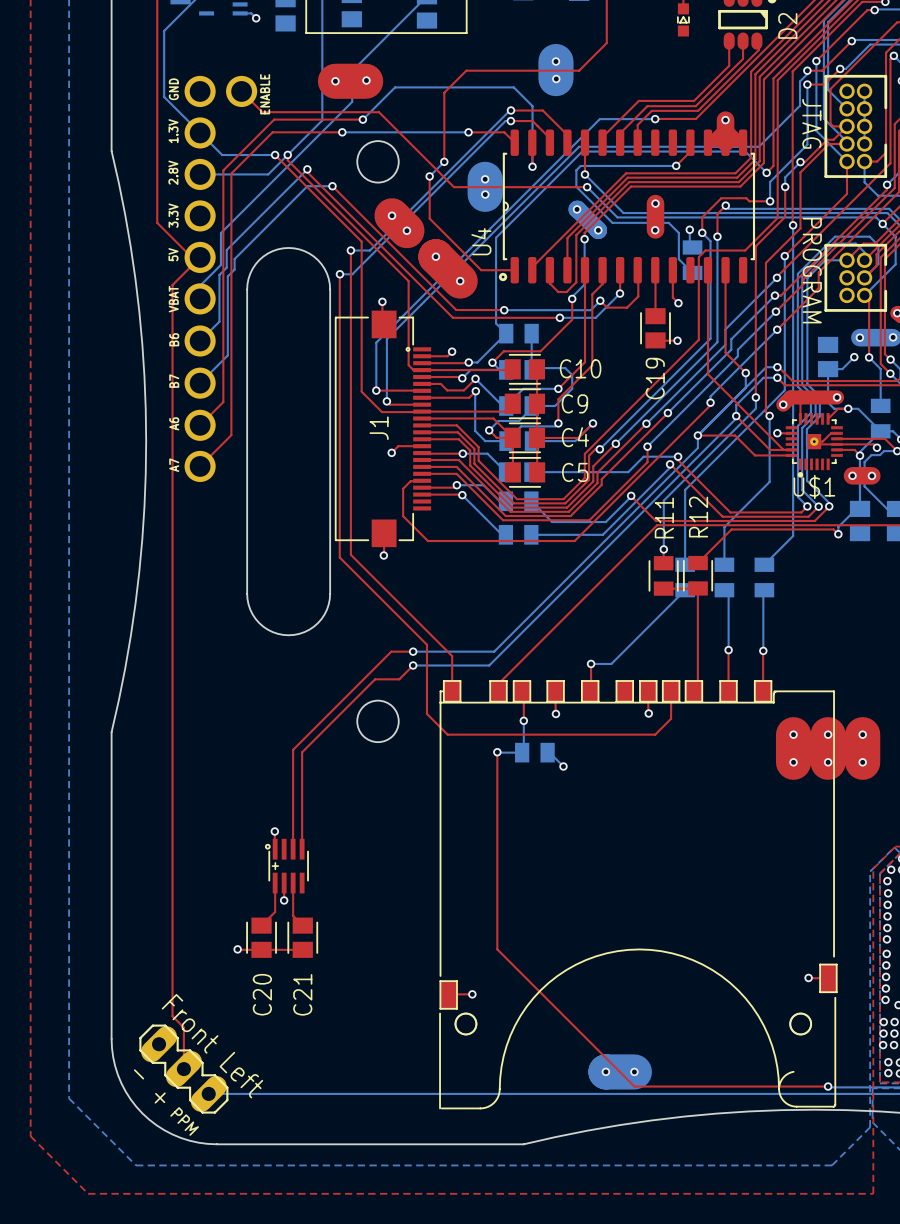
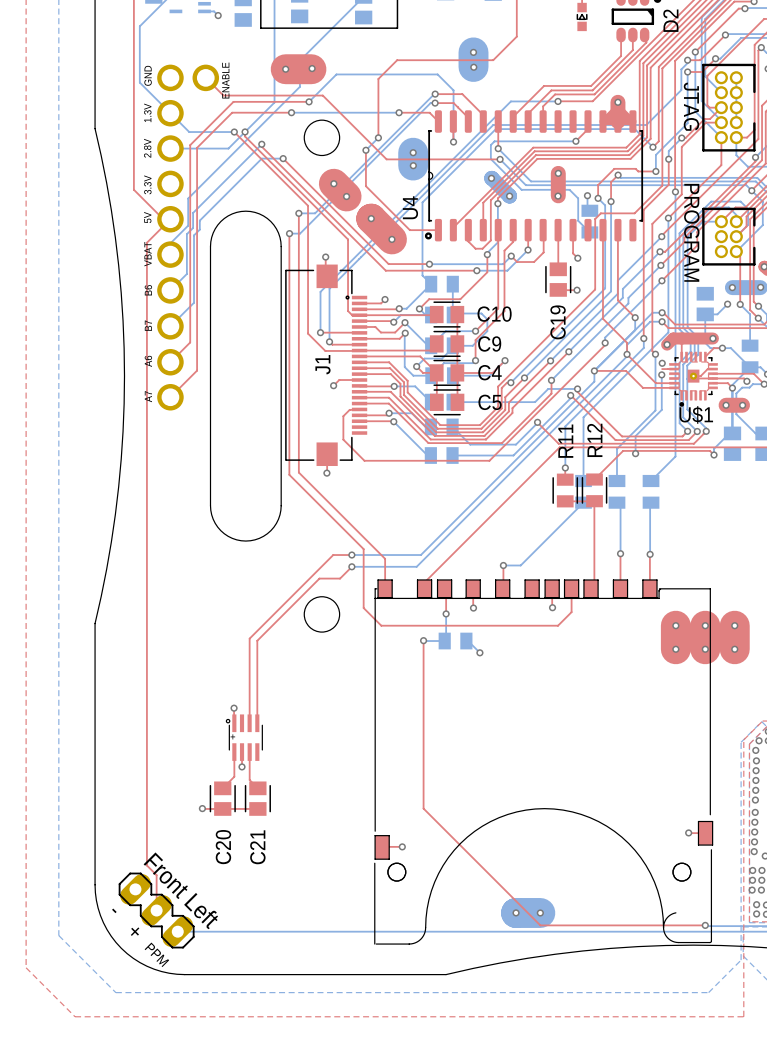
top track: (736, 402) (783, 449) -> (627, 342) (627, 354)
top zone outline: none -> (680, 361) (708, 363) (708, 389) (706, 390) (679, 389) (680, 361)
via: none -> (662, 363)
via: (777, 433) -> none
bottom track: none -> (661, 374) (661, 409) (635, 436) (635, 453)
via: none -> (661, 374)
via: none -> (635, 453)

